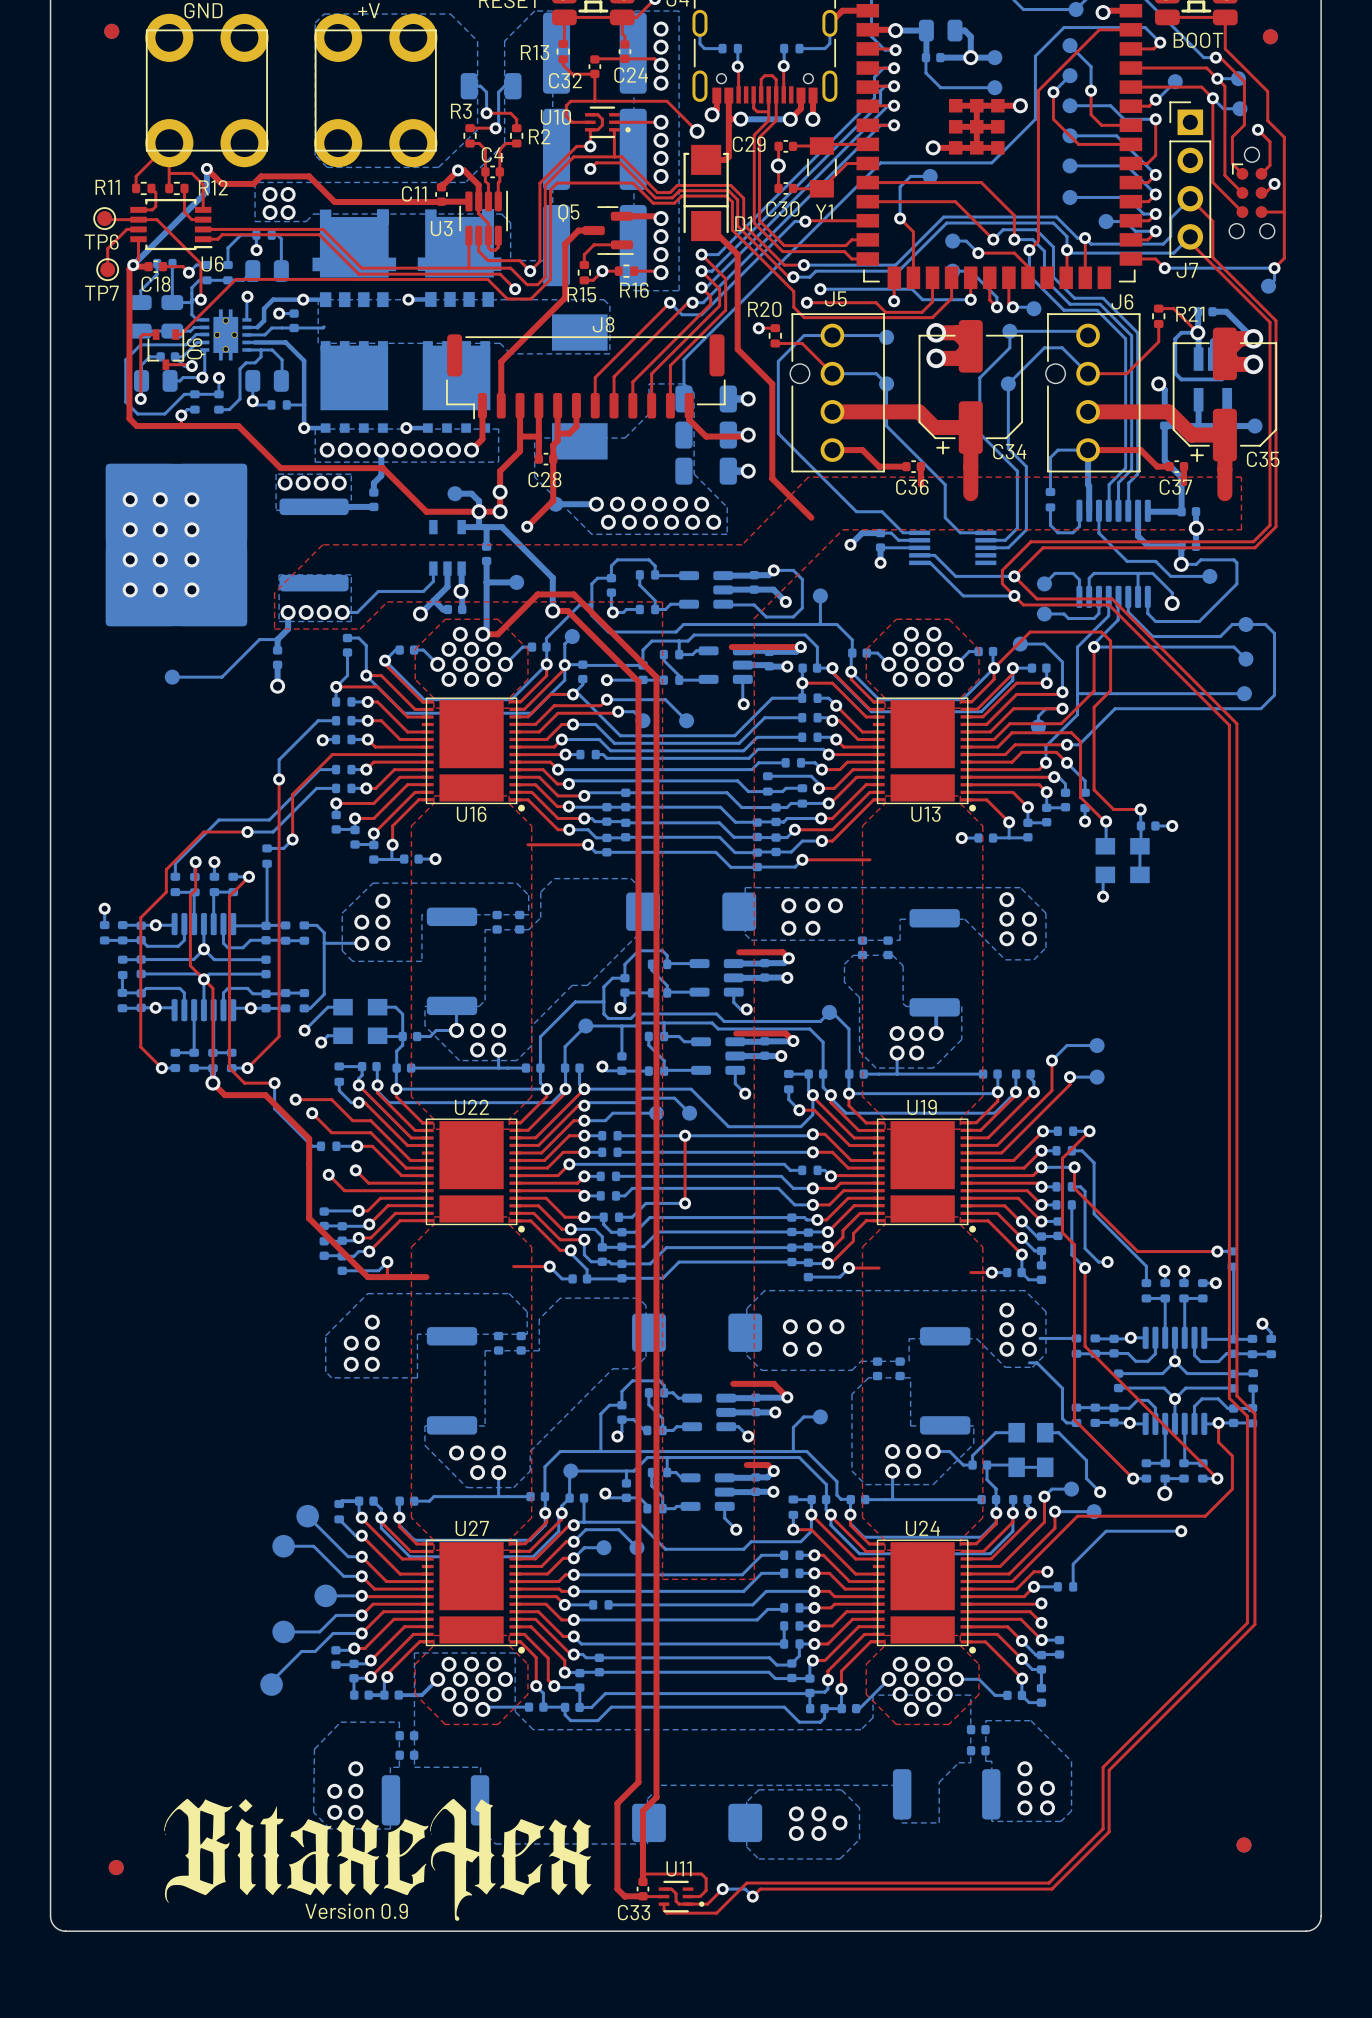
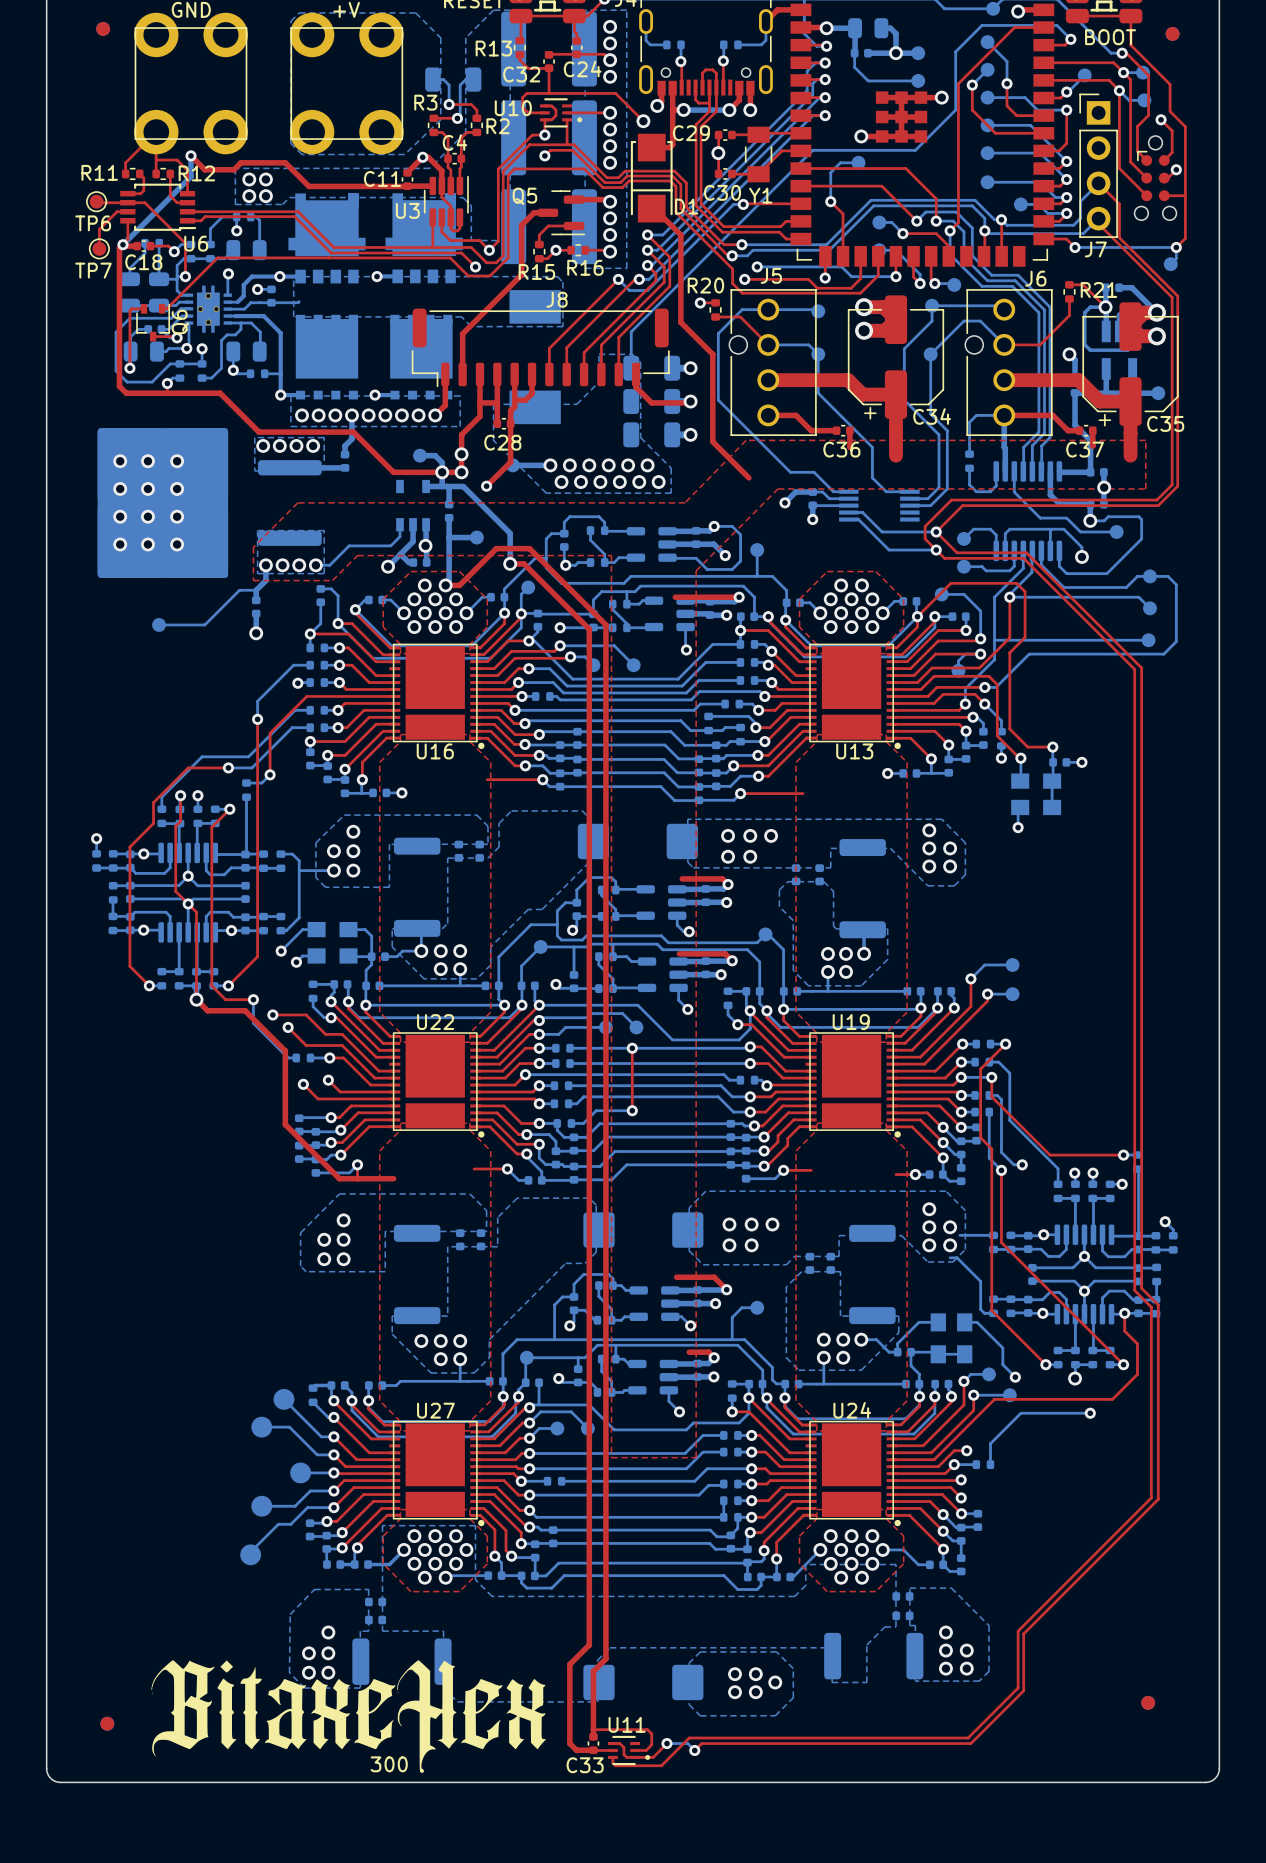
text: Version 0.9 (356, 1911) -> none
text: none -> 300 (389, 1764)

